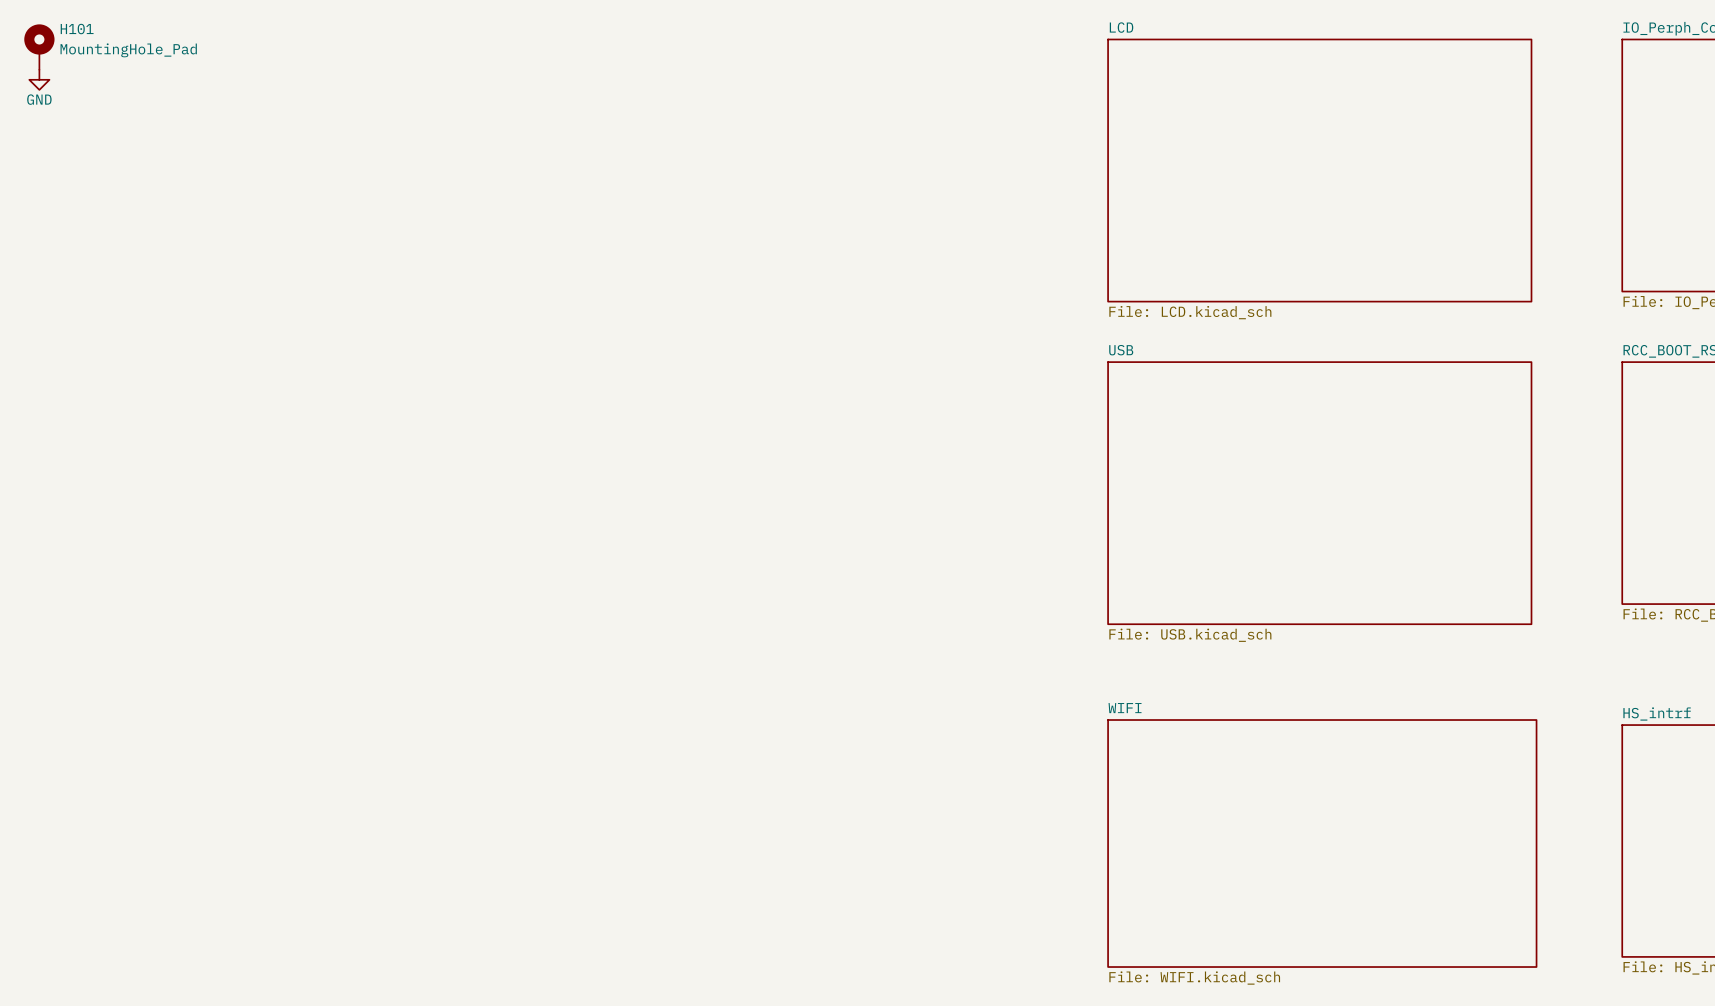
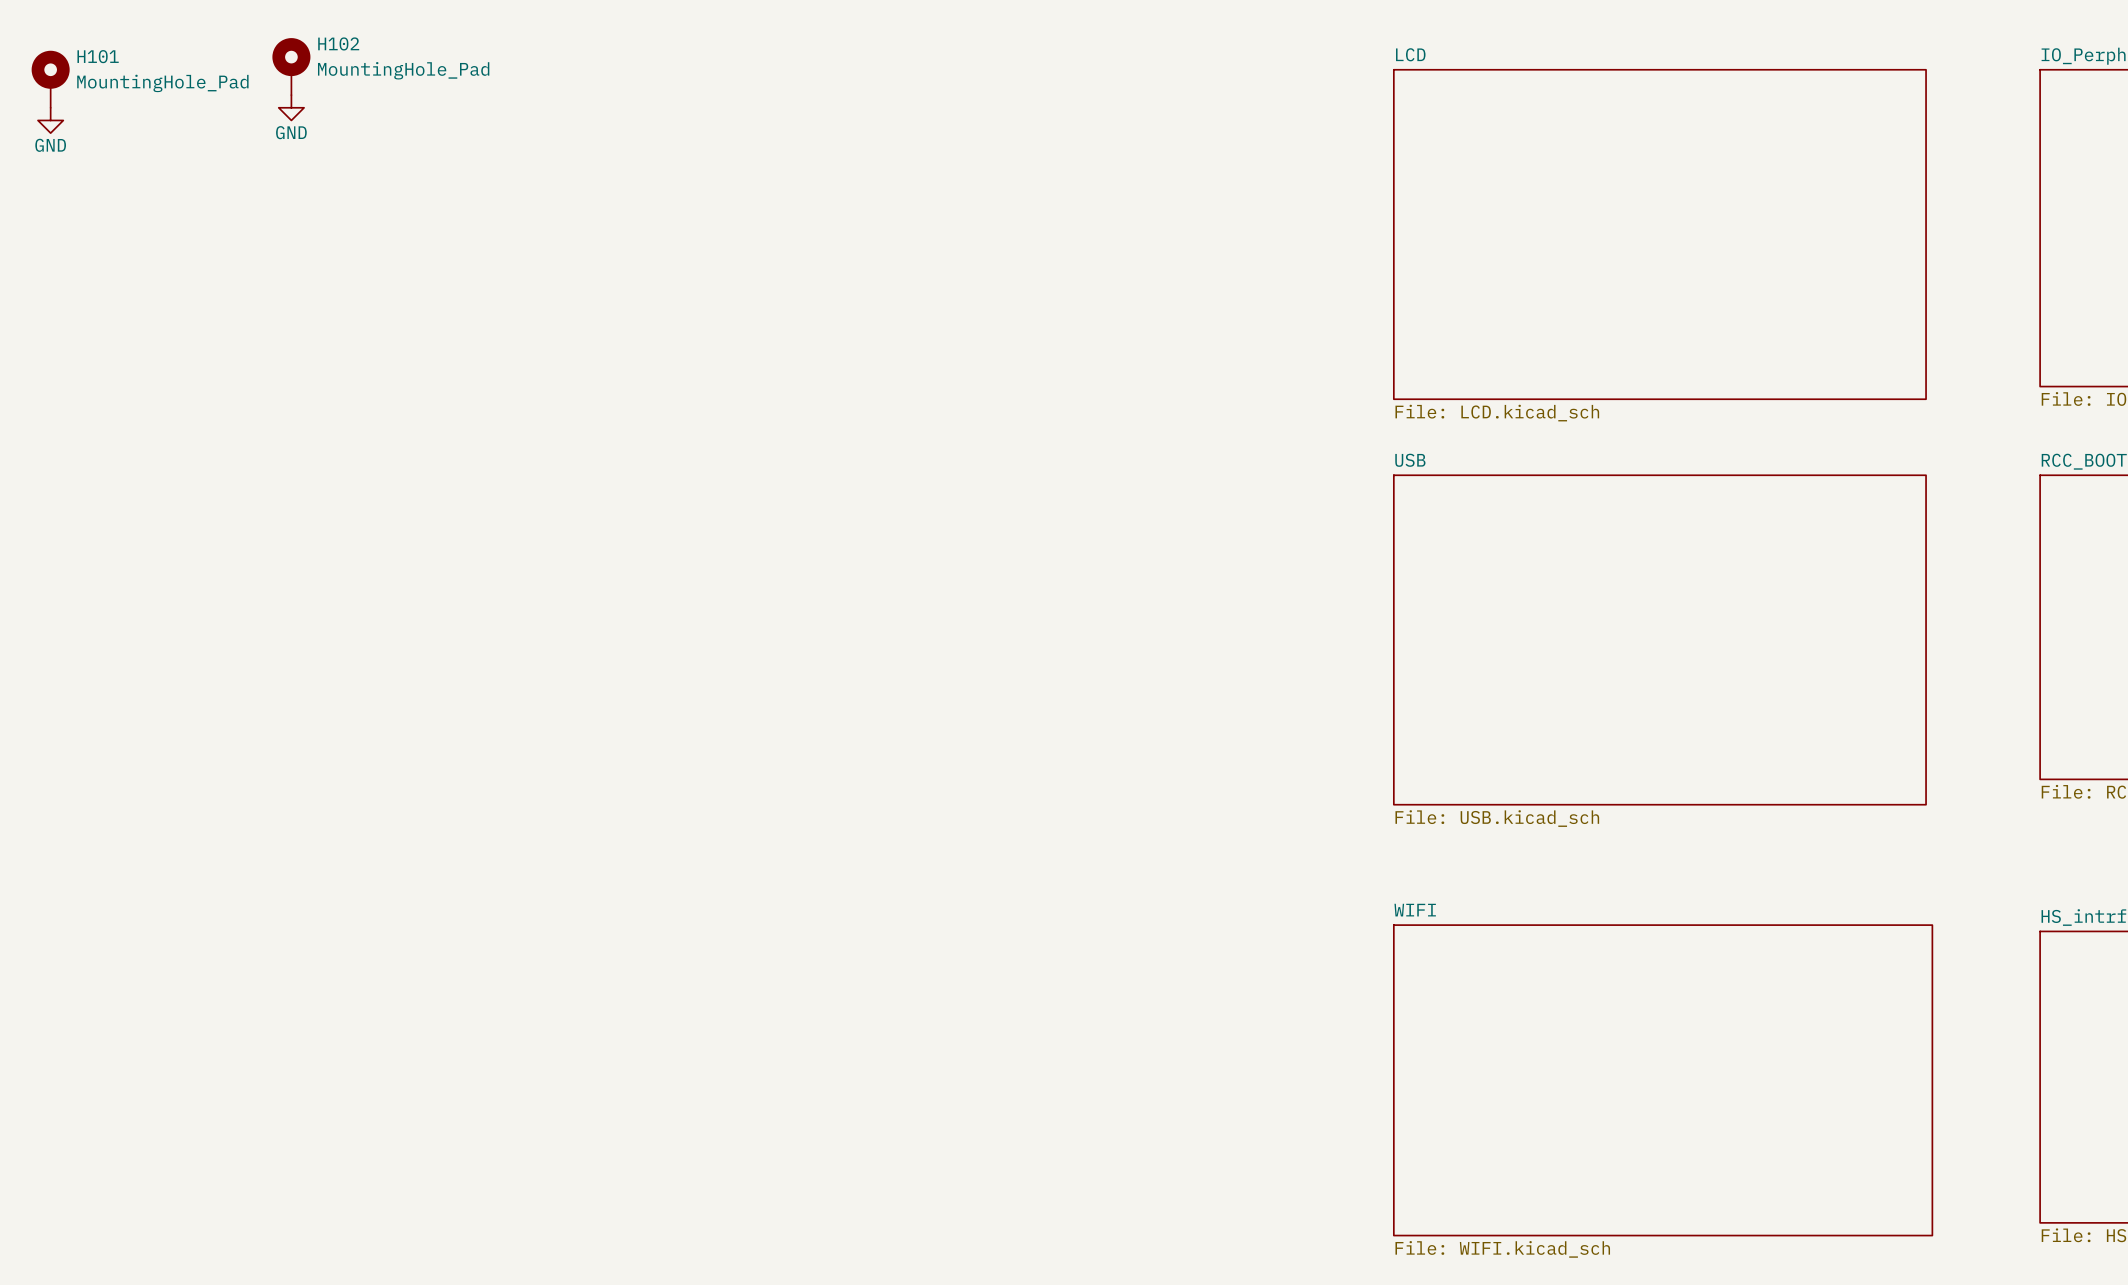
H102: none -> MountingHole_Pad (291, 66)
power symbol: none -> GND (291, 107)

